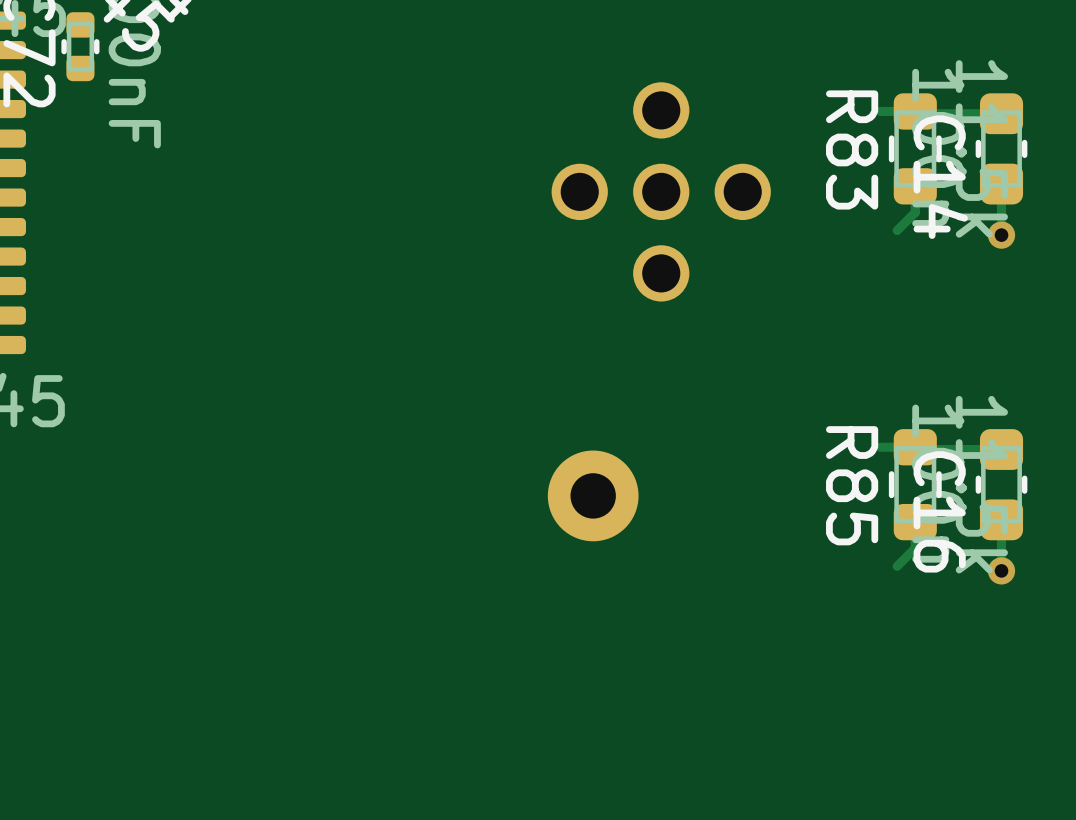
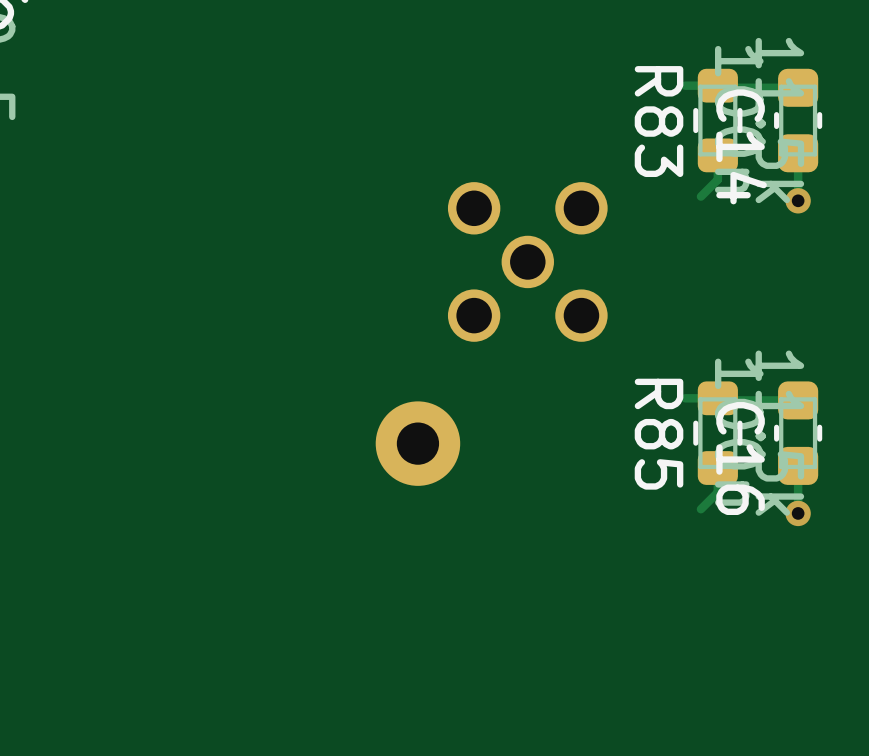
part: (661, 191) -> none
part: none -> (527, 261)

